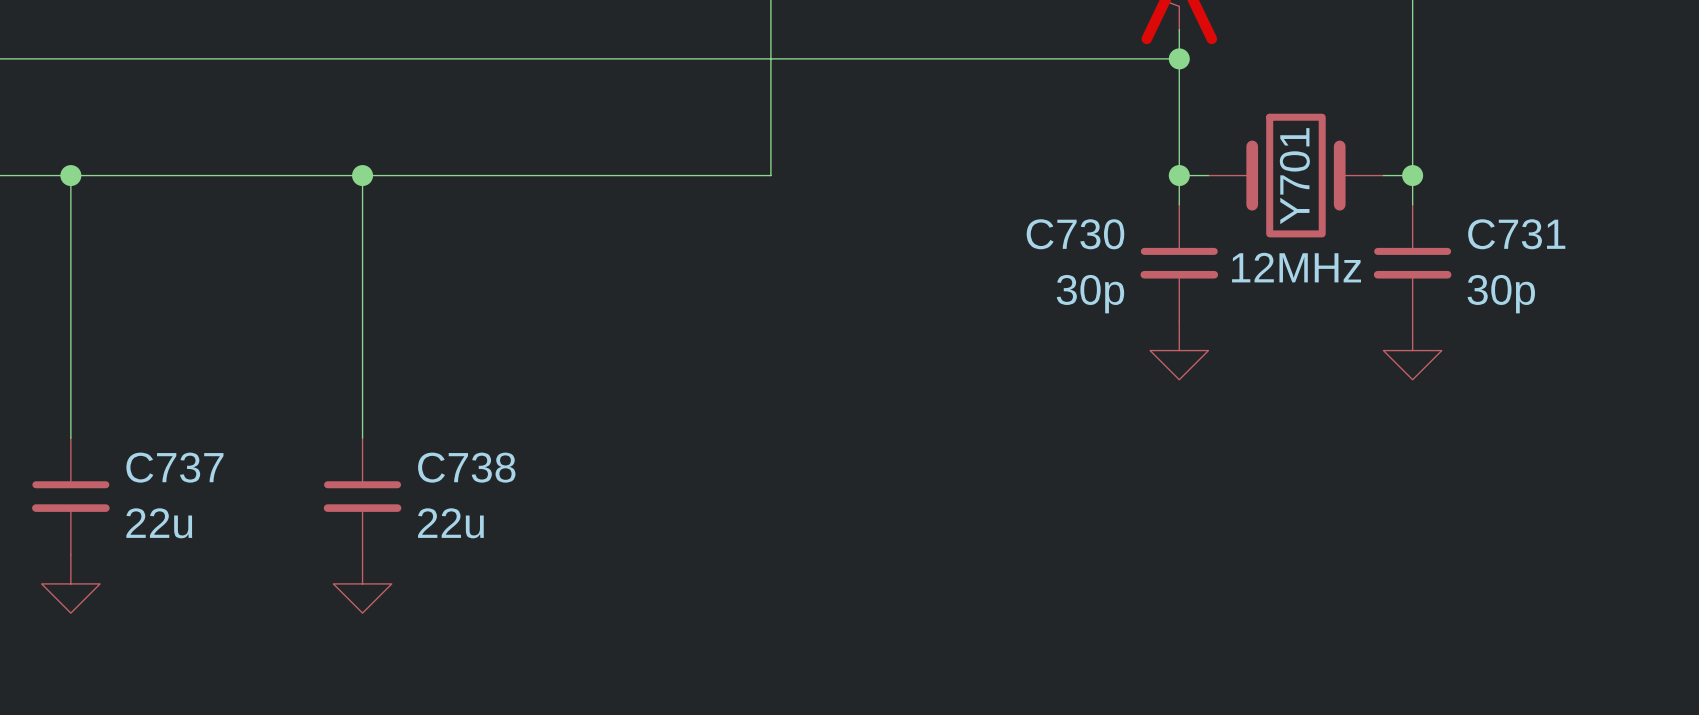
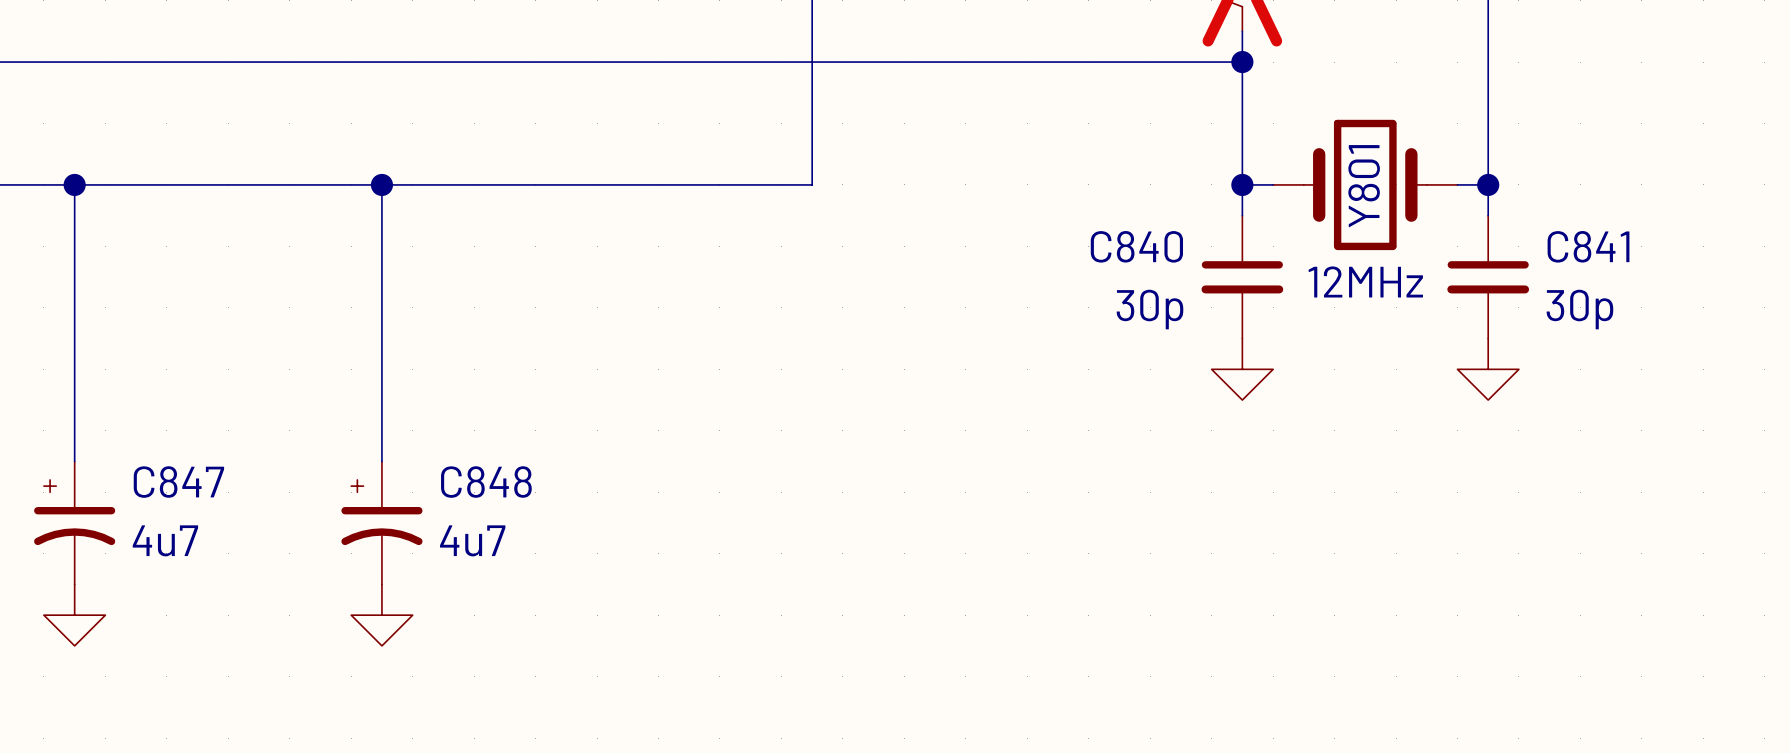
Y701 name: Y701 (1294, 176) -> Y801 (1364, 186)
C730 name: C730 (1075, 234) -> C840 (1136, 246)
C731 name: C731 (1516, 234) -> C841 (1588, 246)
C737: 22u (70, 496) -> none
C847: none -> 4u7 (74, 522)
C738: 22u (362, 496) -> none
C848: none -> 4u7 (381, 522)

